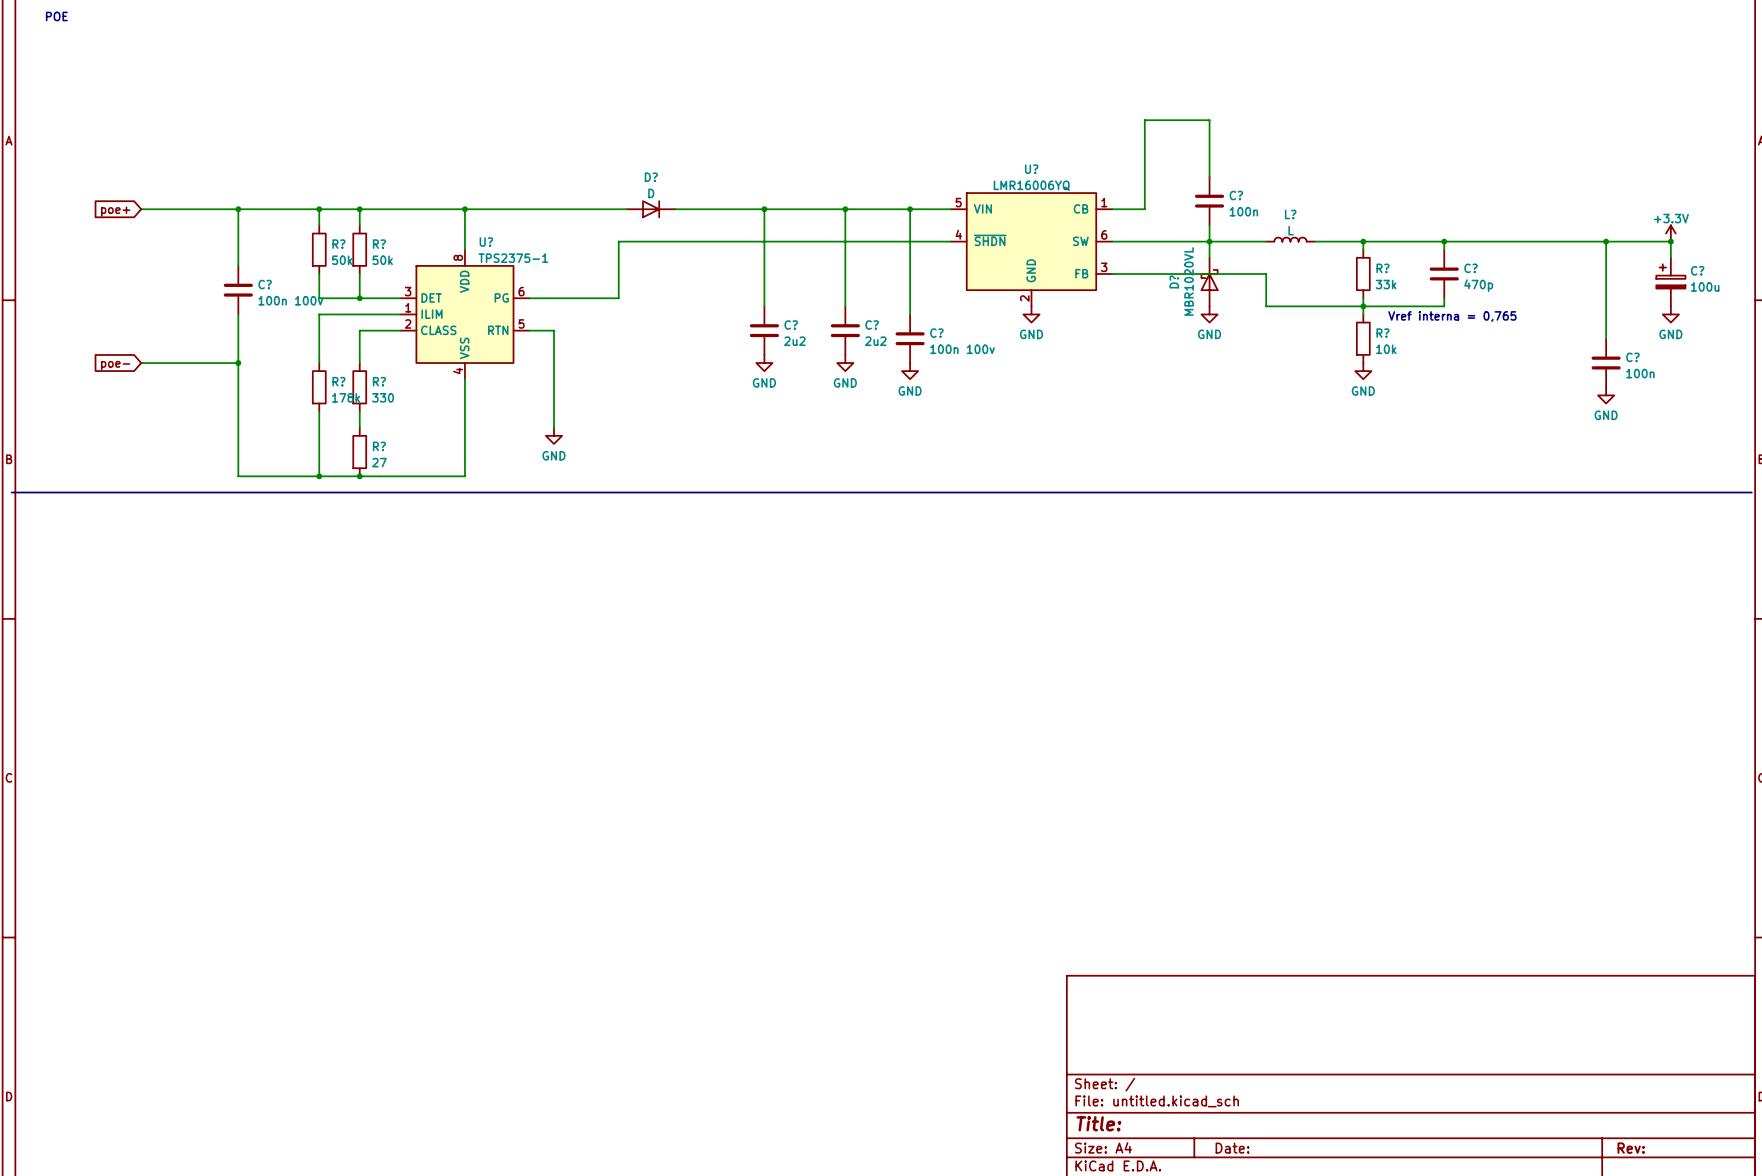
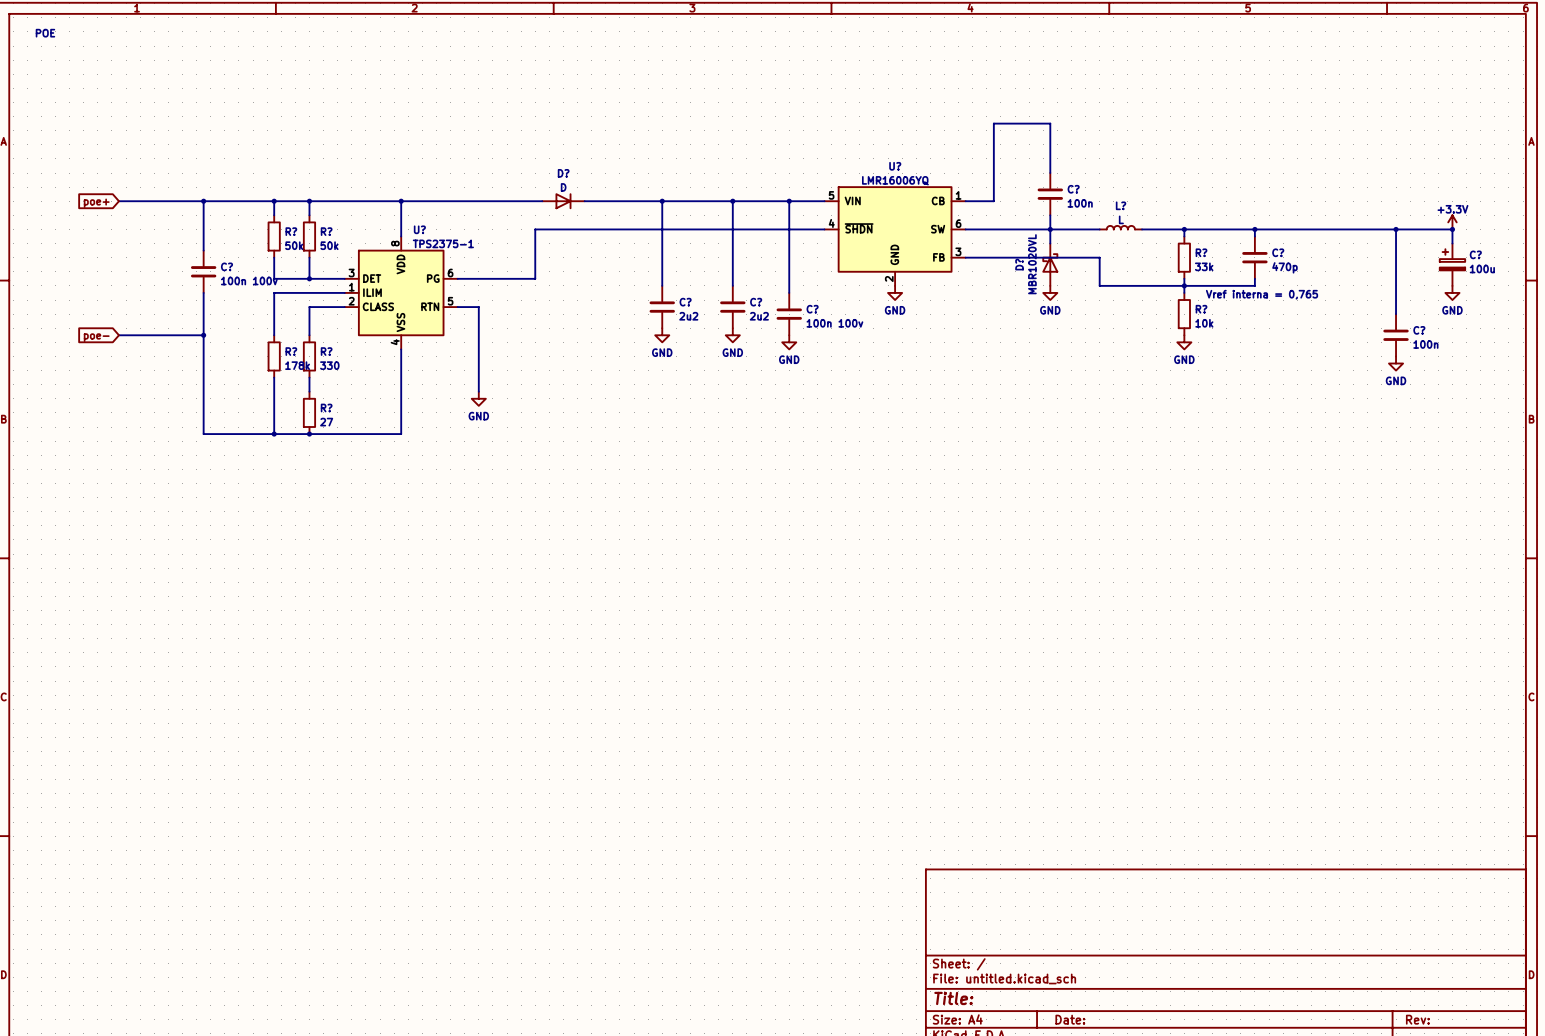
line: (11, 492) (1751, 492) -> none

